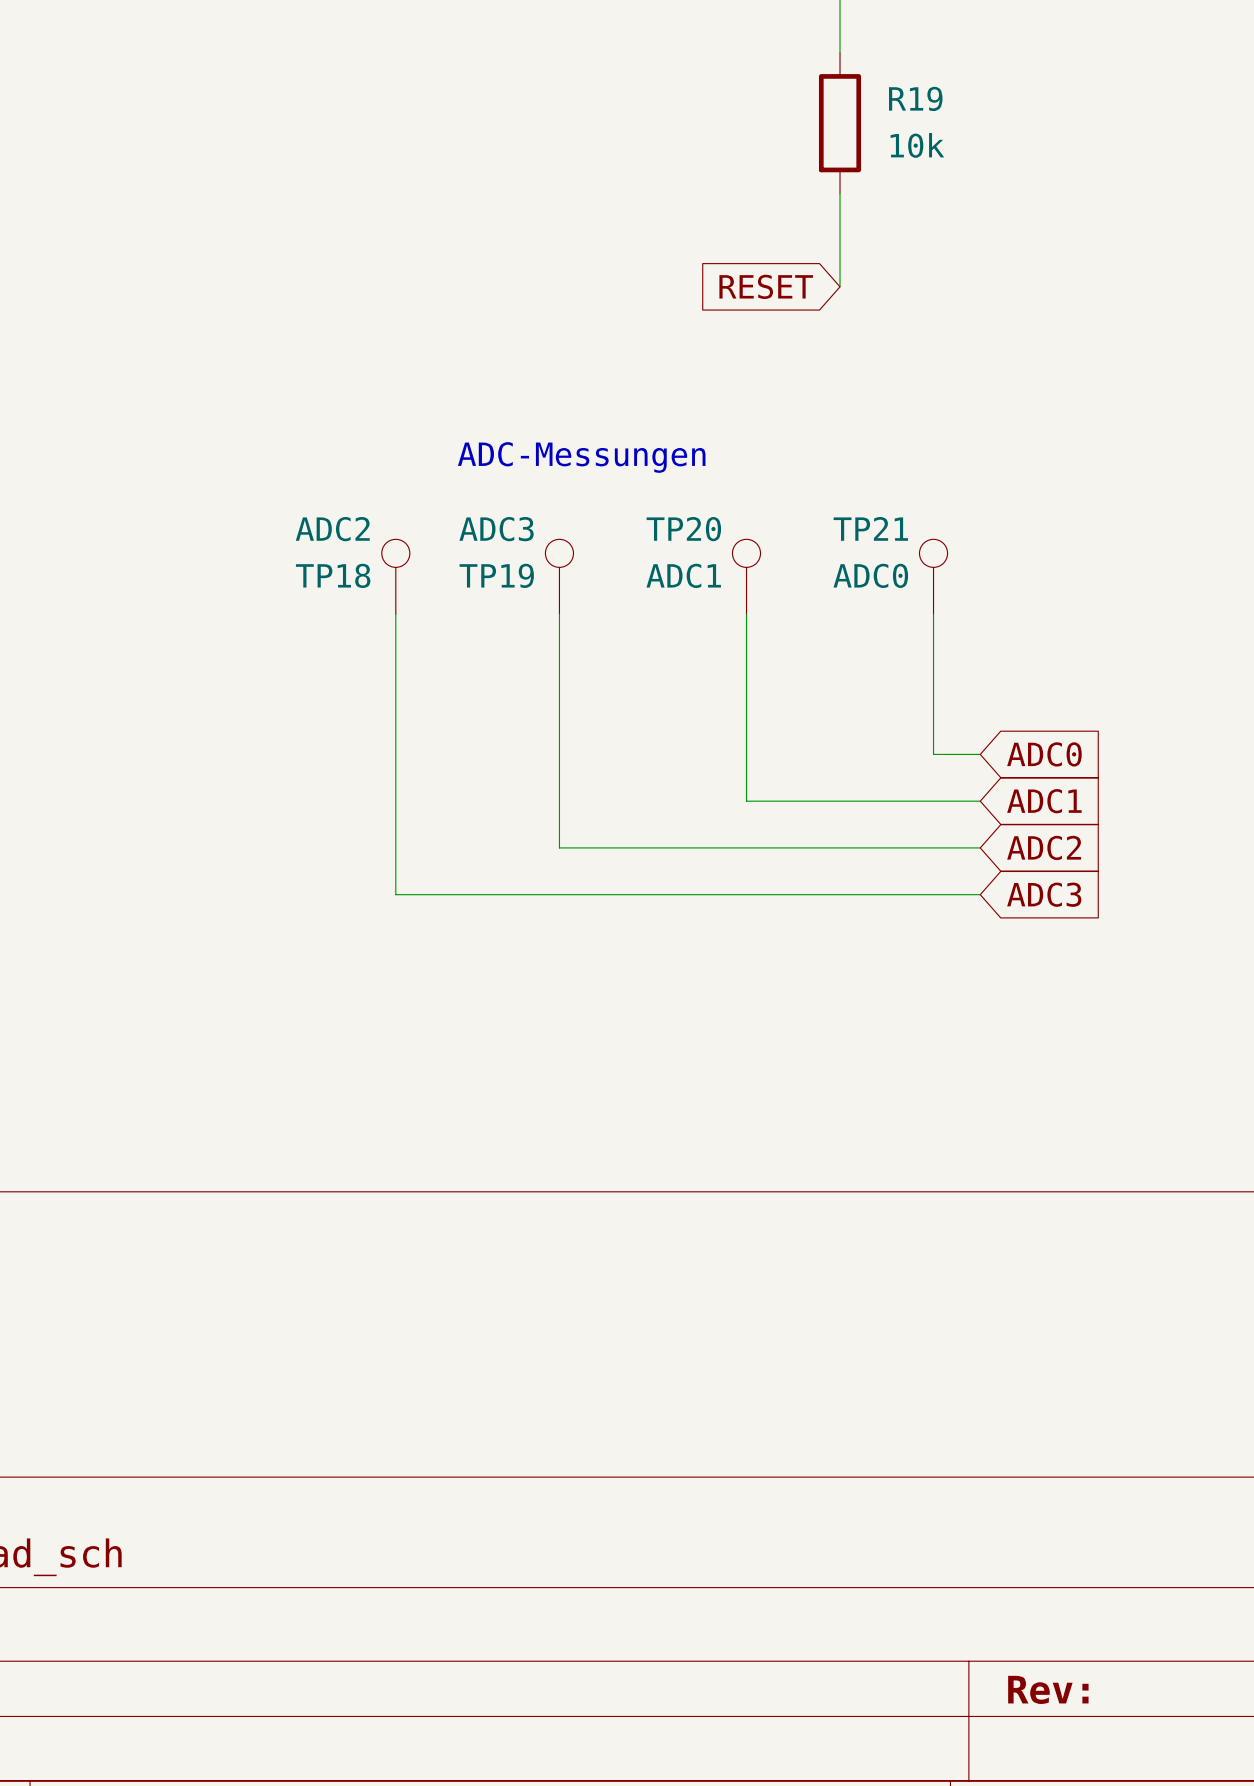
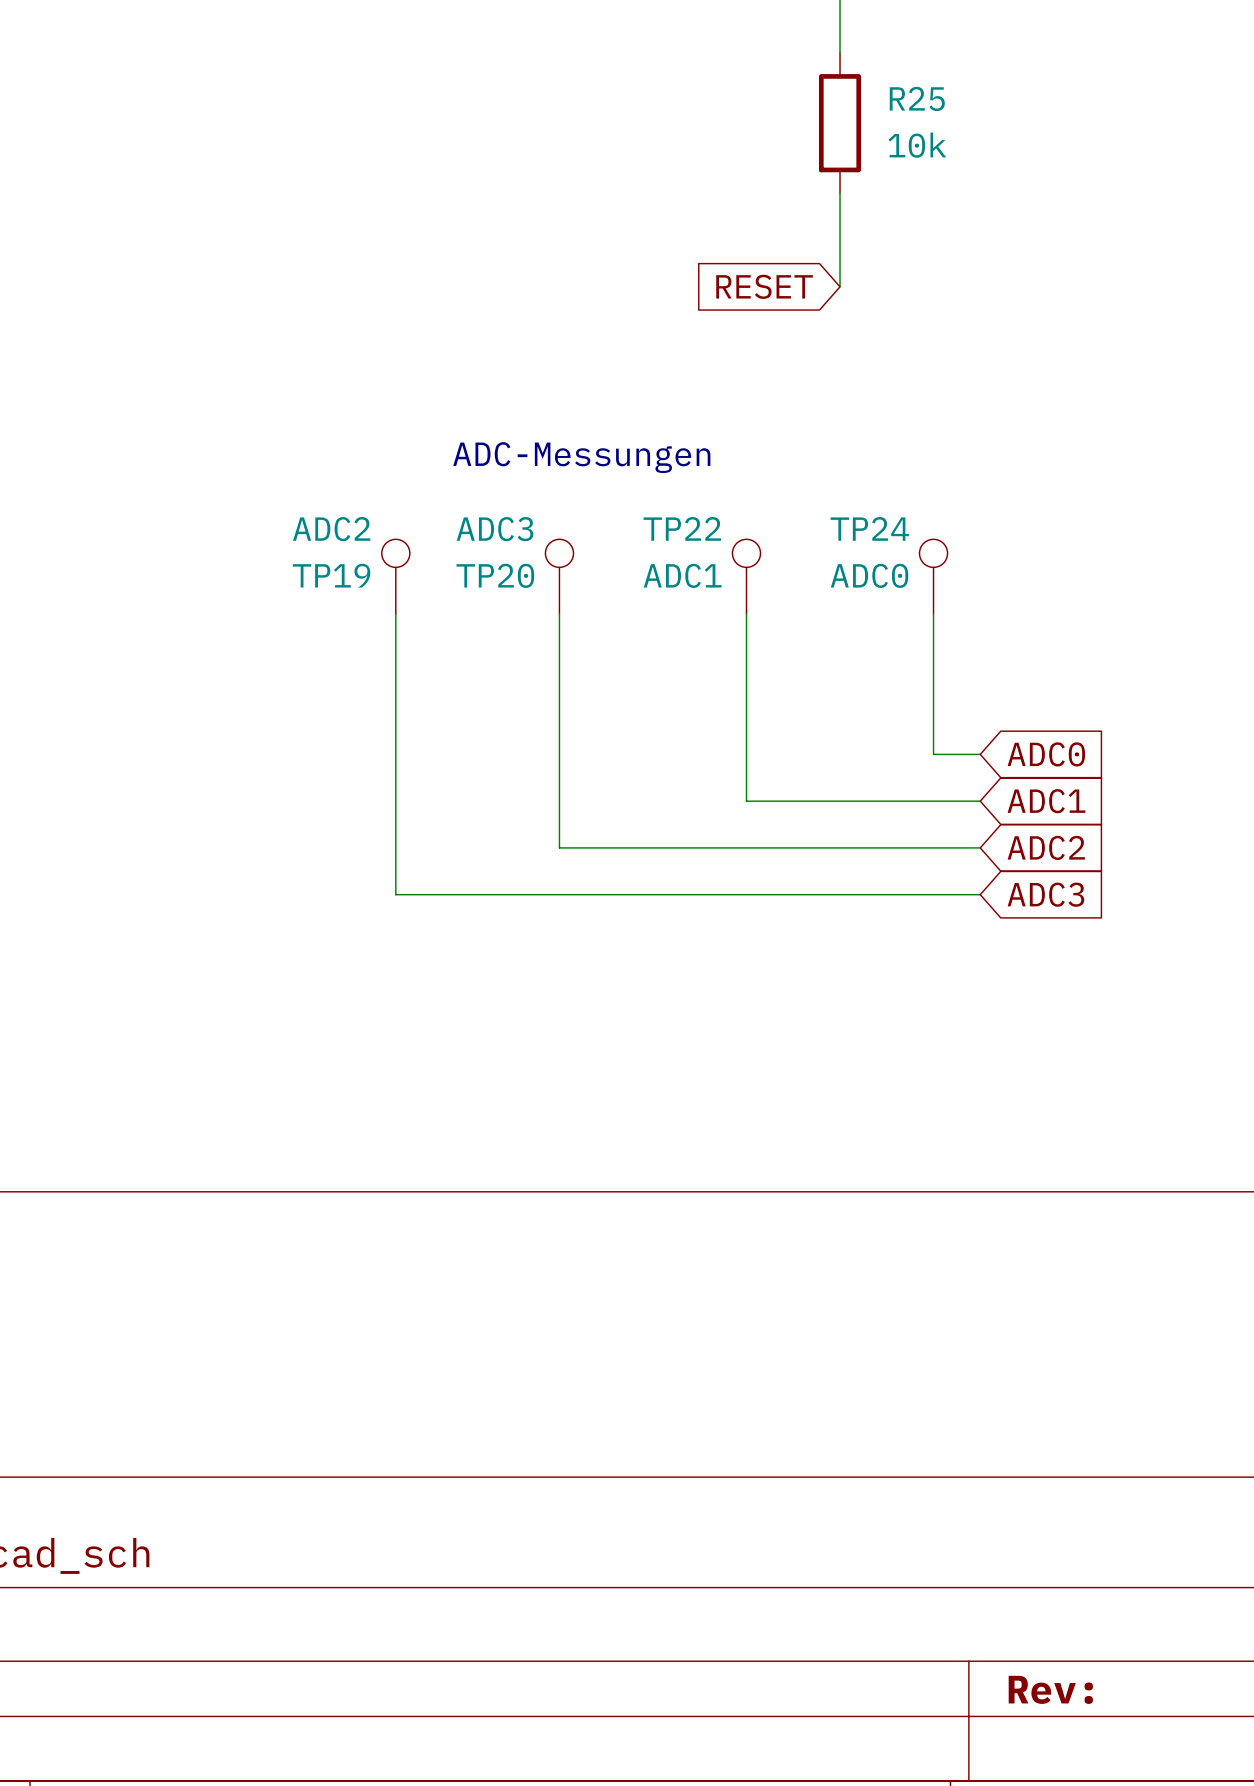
R19 name: R19 (915, 98) -> R25 (917, 98)
TP21 name: TP21 (870, 528) -> TP24 (869, 528)
TP20 name: TP20 (683, 529) -> TP22 (682, 528)
TP18 name: TP18 (333, 575) -> TP19 (331, 575)
TP19 name: TP19 (496, 575) -> TP20 (495, 575)

